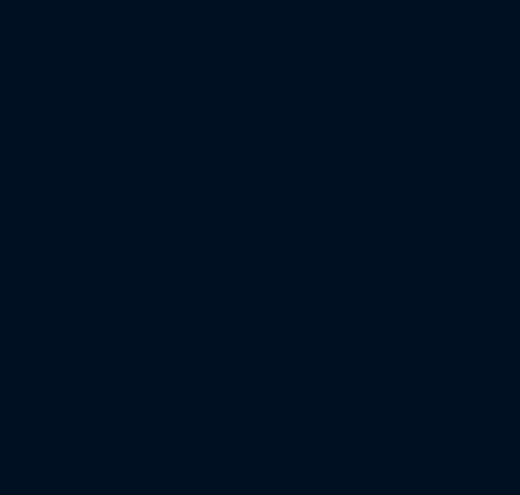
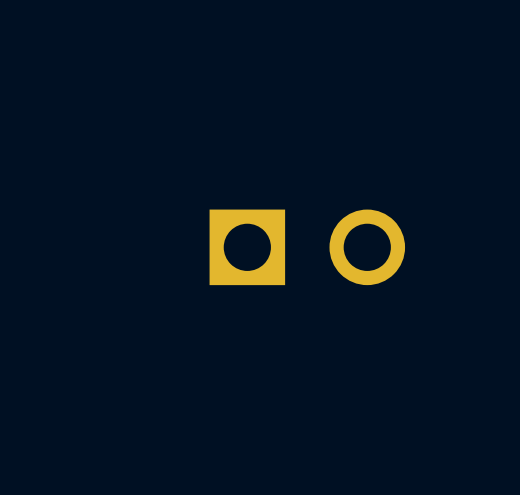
part: none -> (307, 247)

